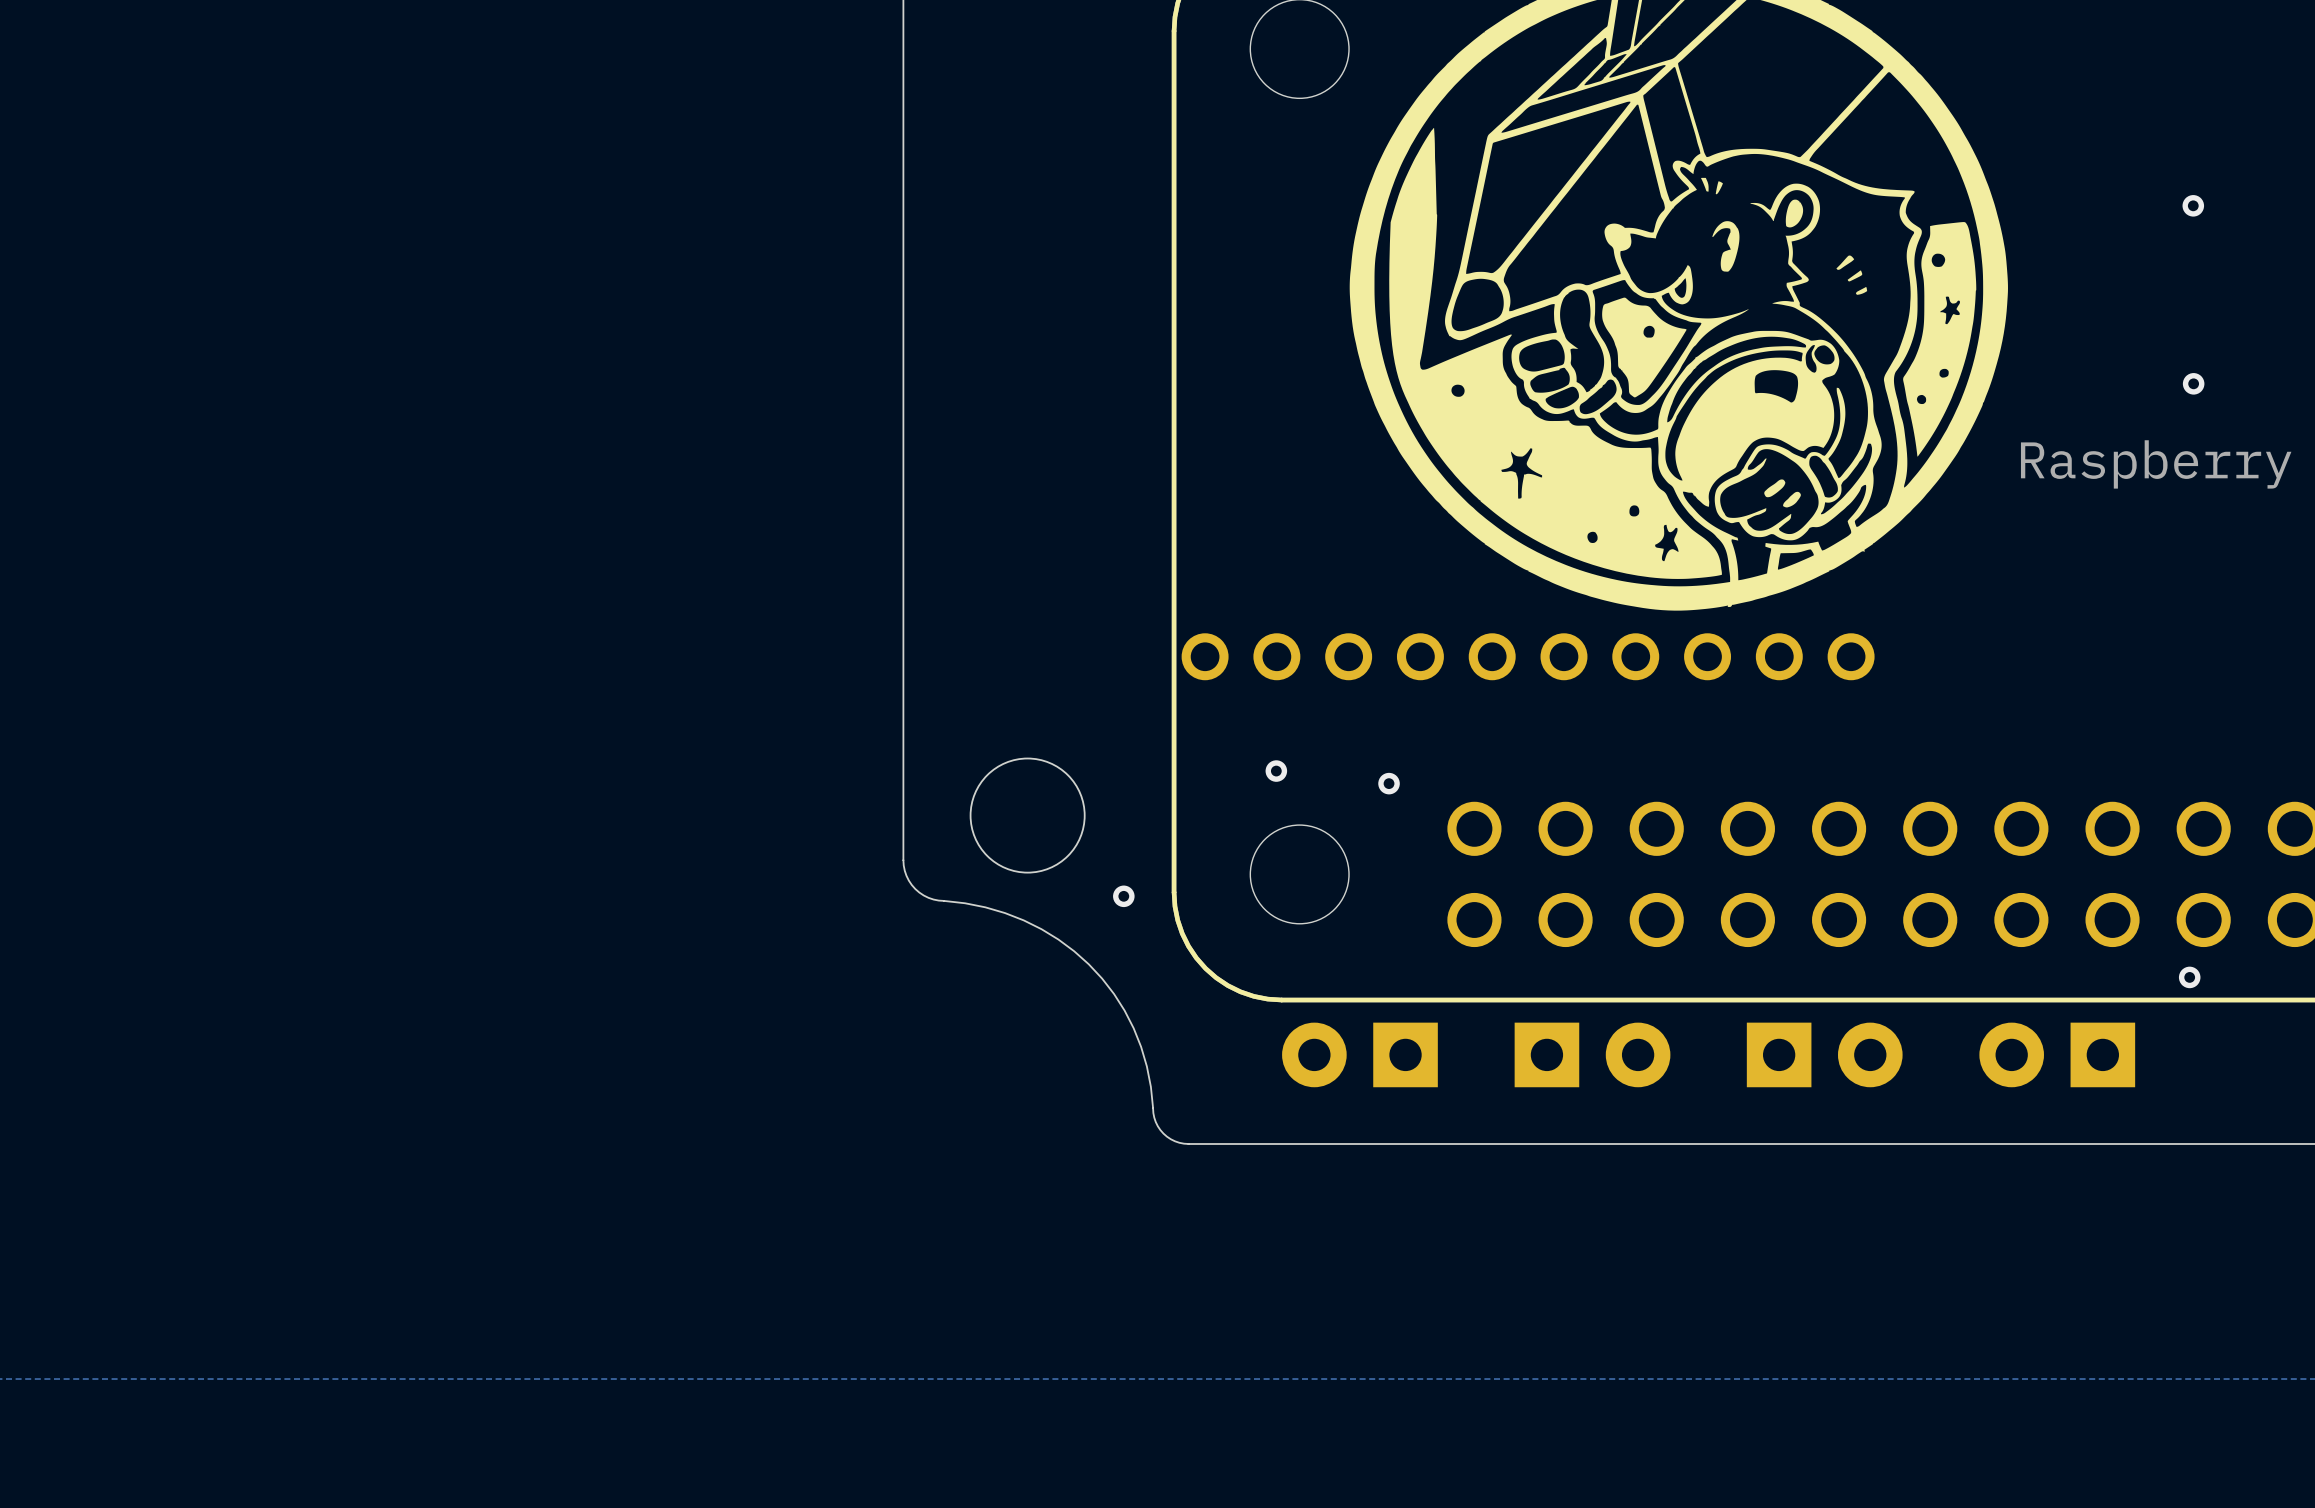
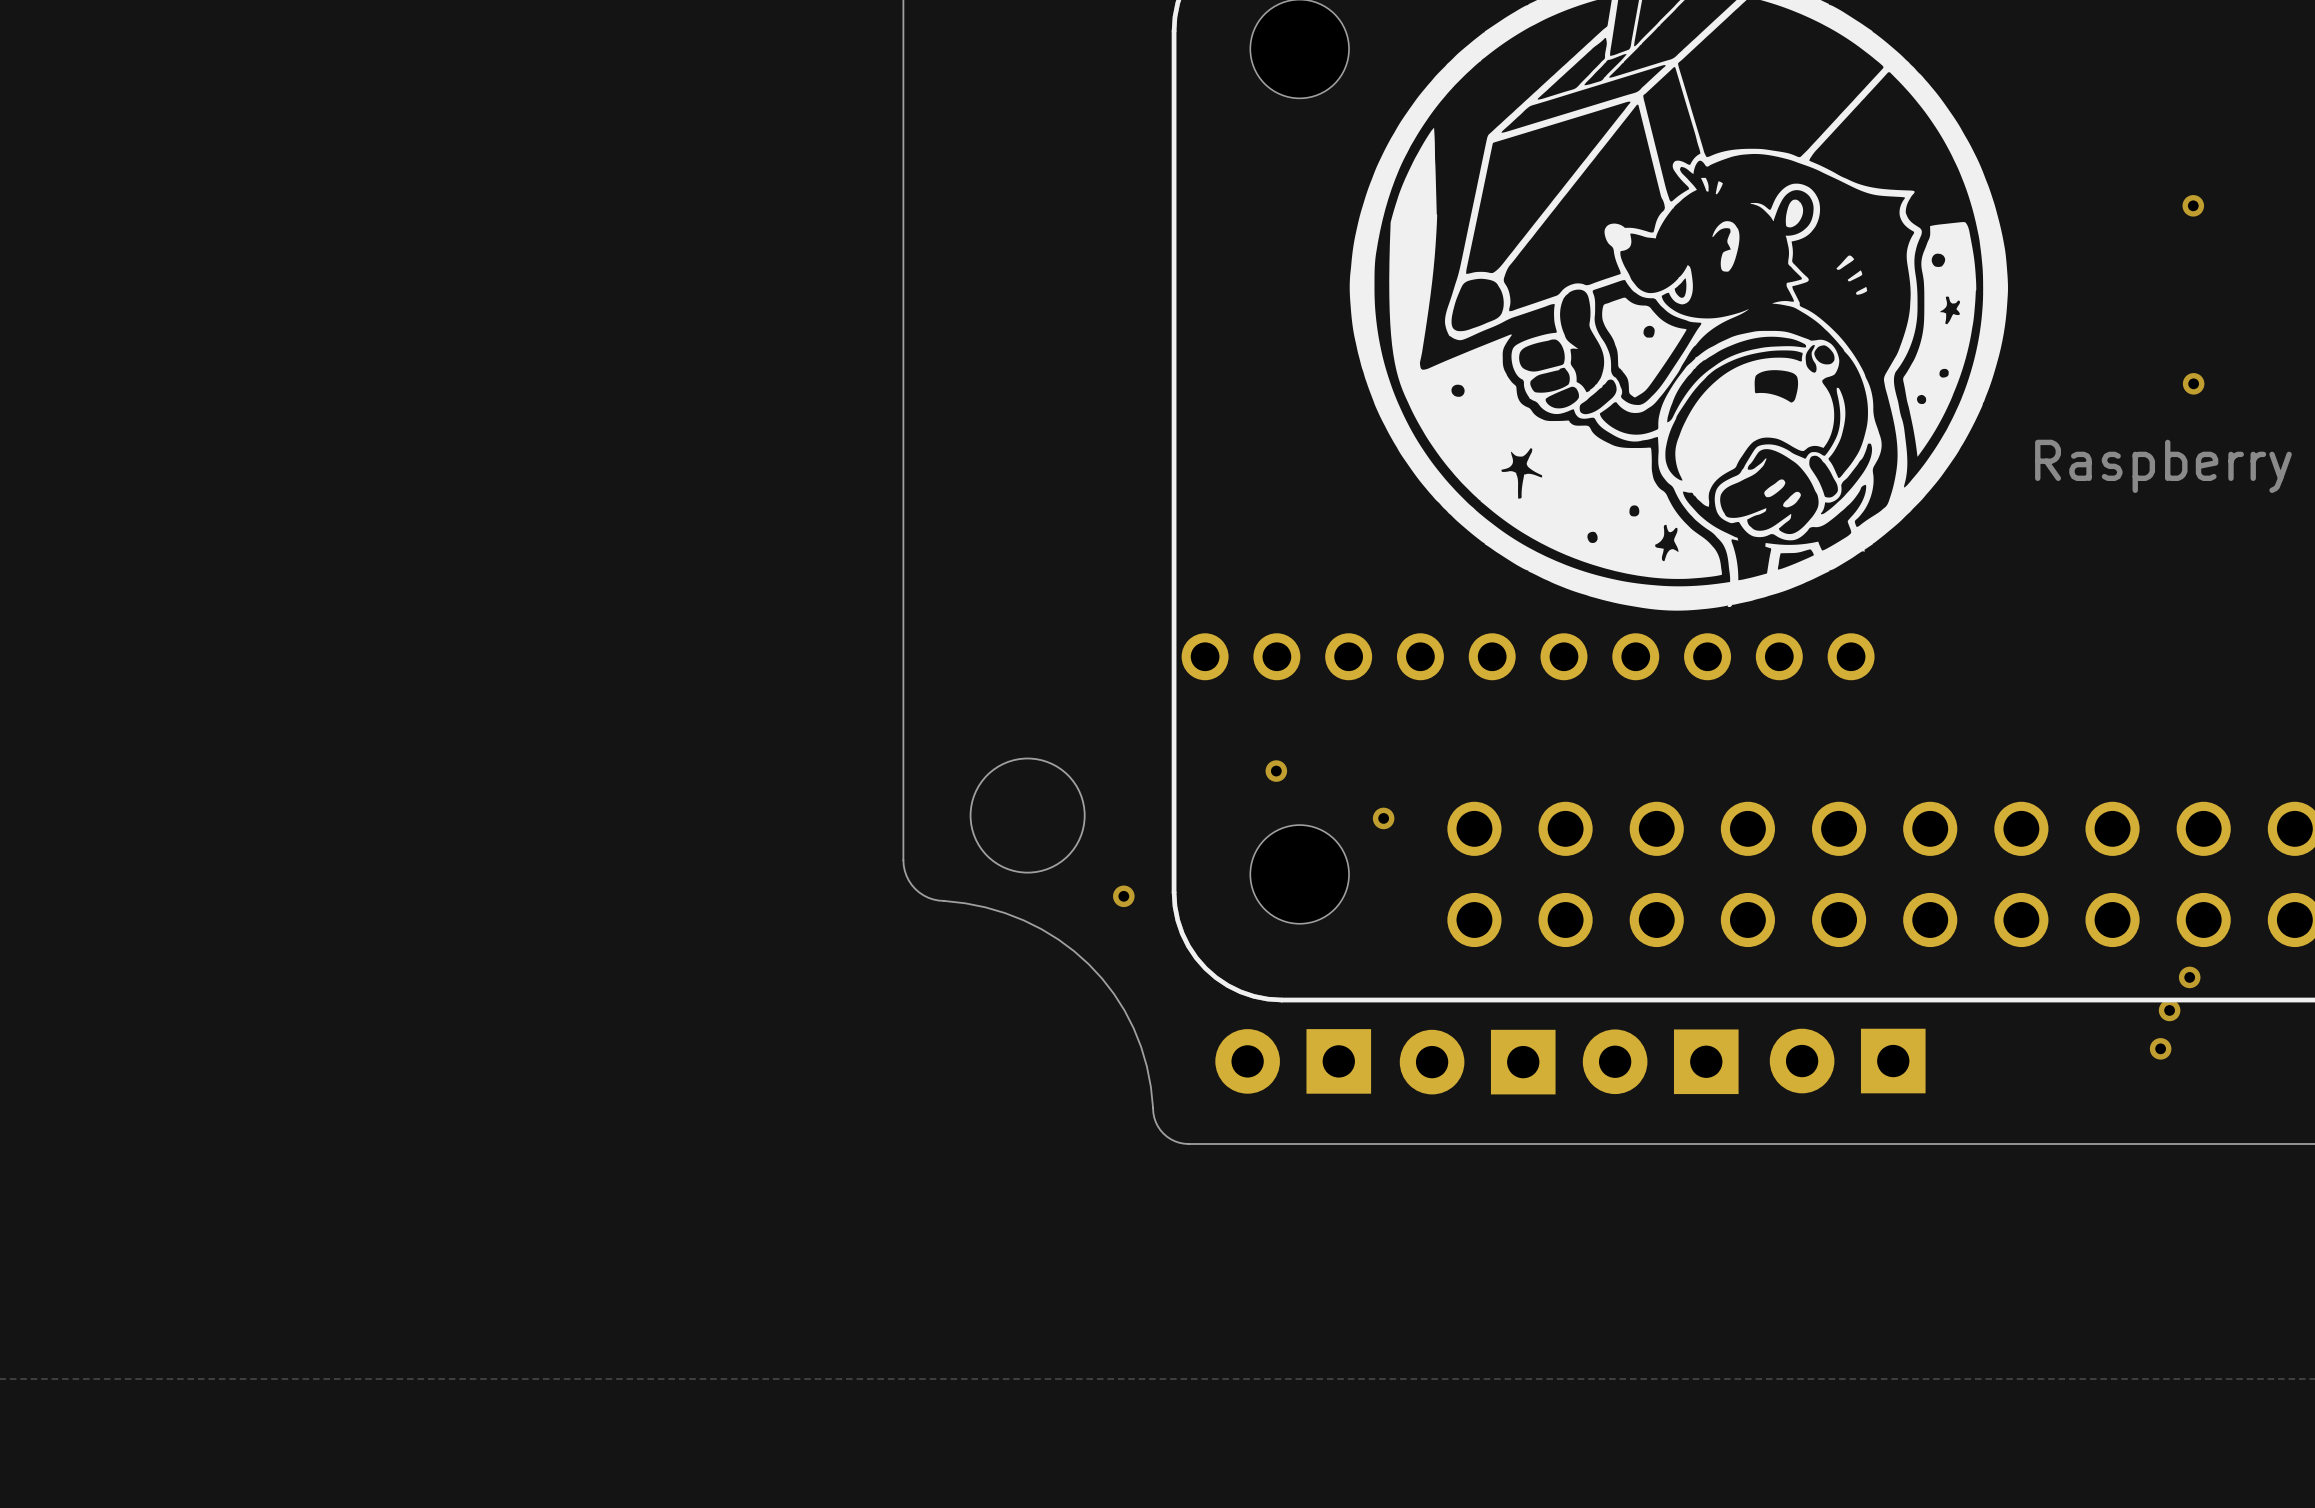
via position: (1389, 783) -> (1383, 818)
via: none -> (2169, 1010)
via: none -> (2160, 1048)
part: (1359, 1054) -> none
part: (1592, 1054) -> none
part rotation: 0° (1824, 1054) -> 180° (1847, 1061)
part: (2057, 1054) -> none
part: none -> (1293, 1061)
part: none -> (1660, 1061)
part: none -> (1477, 1062)

